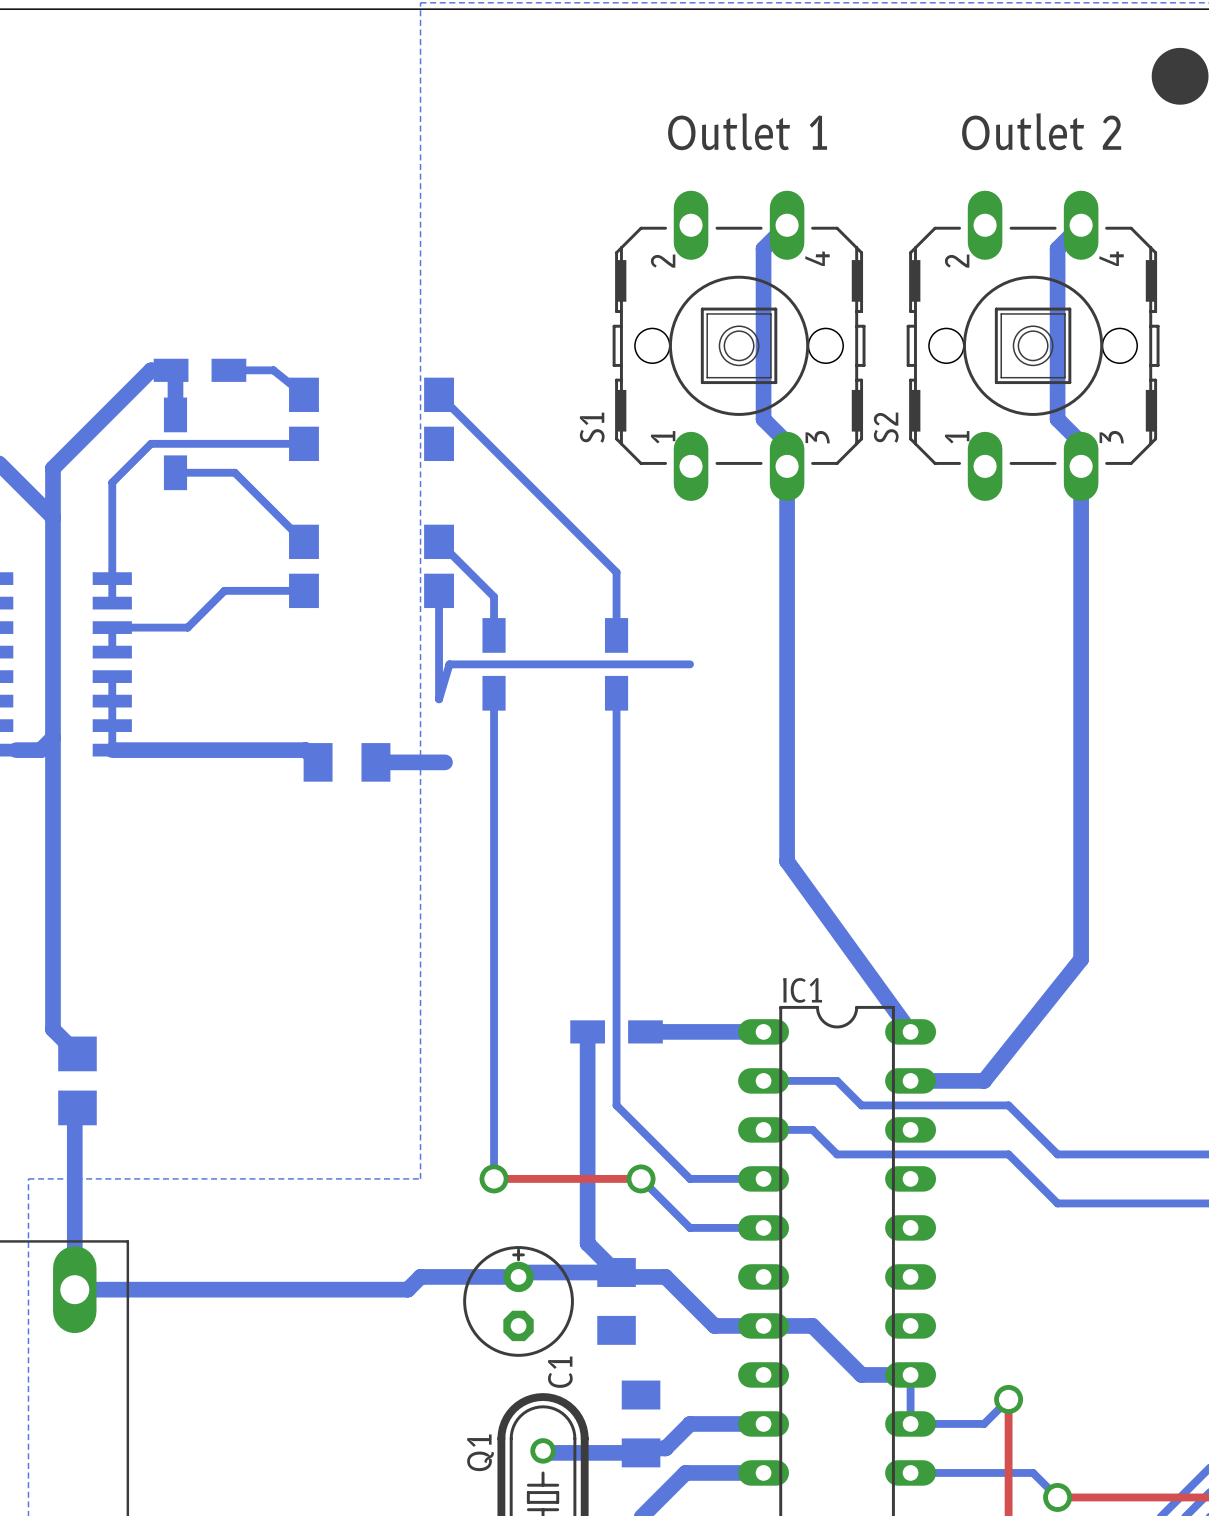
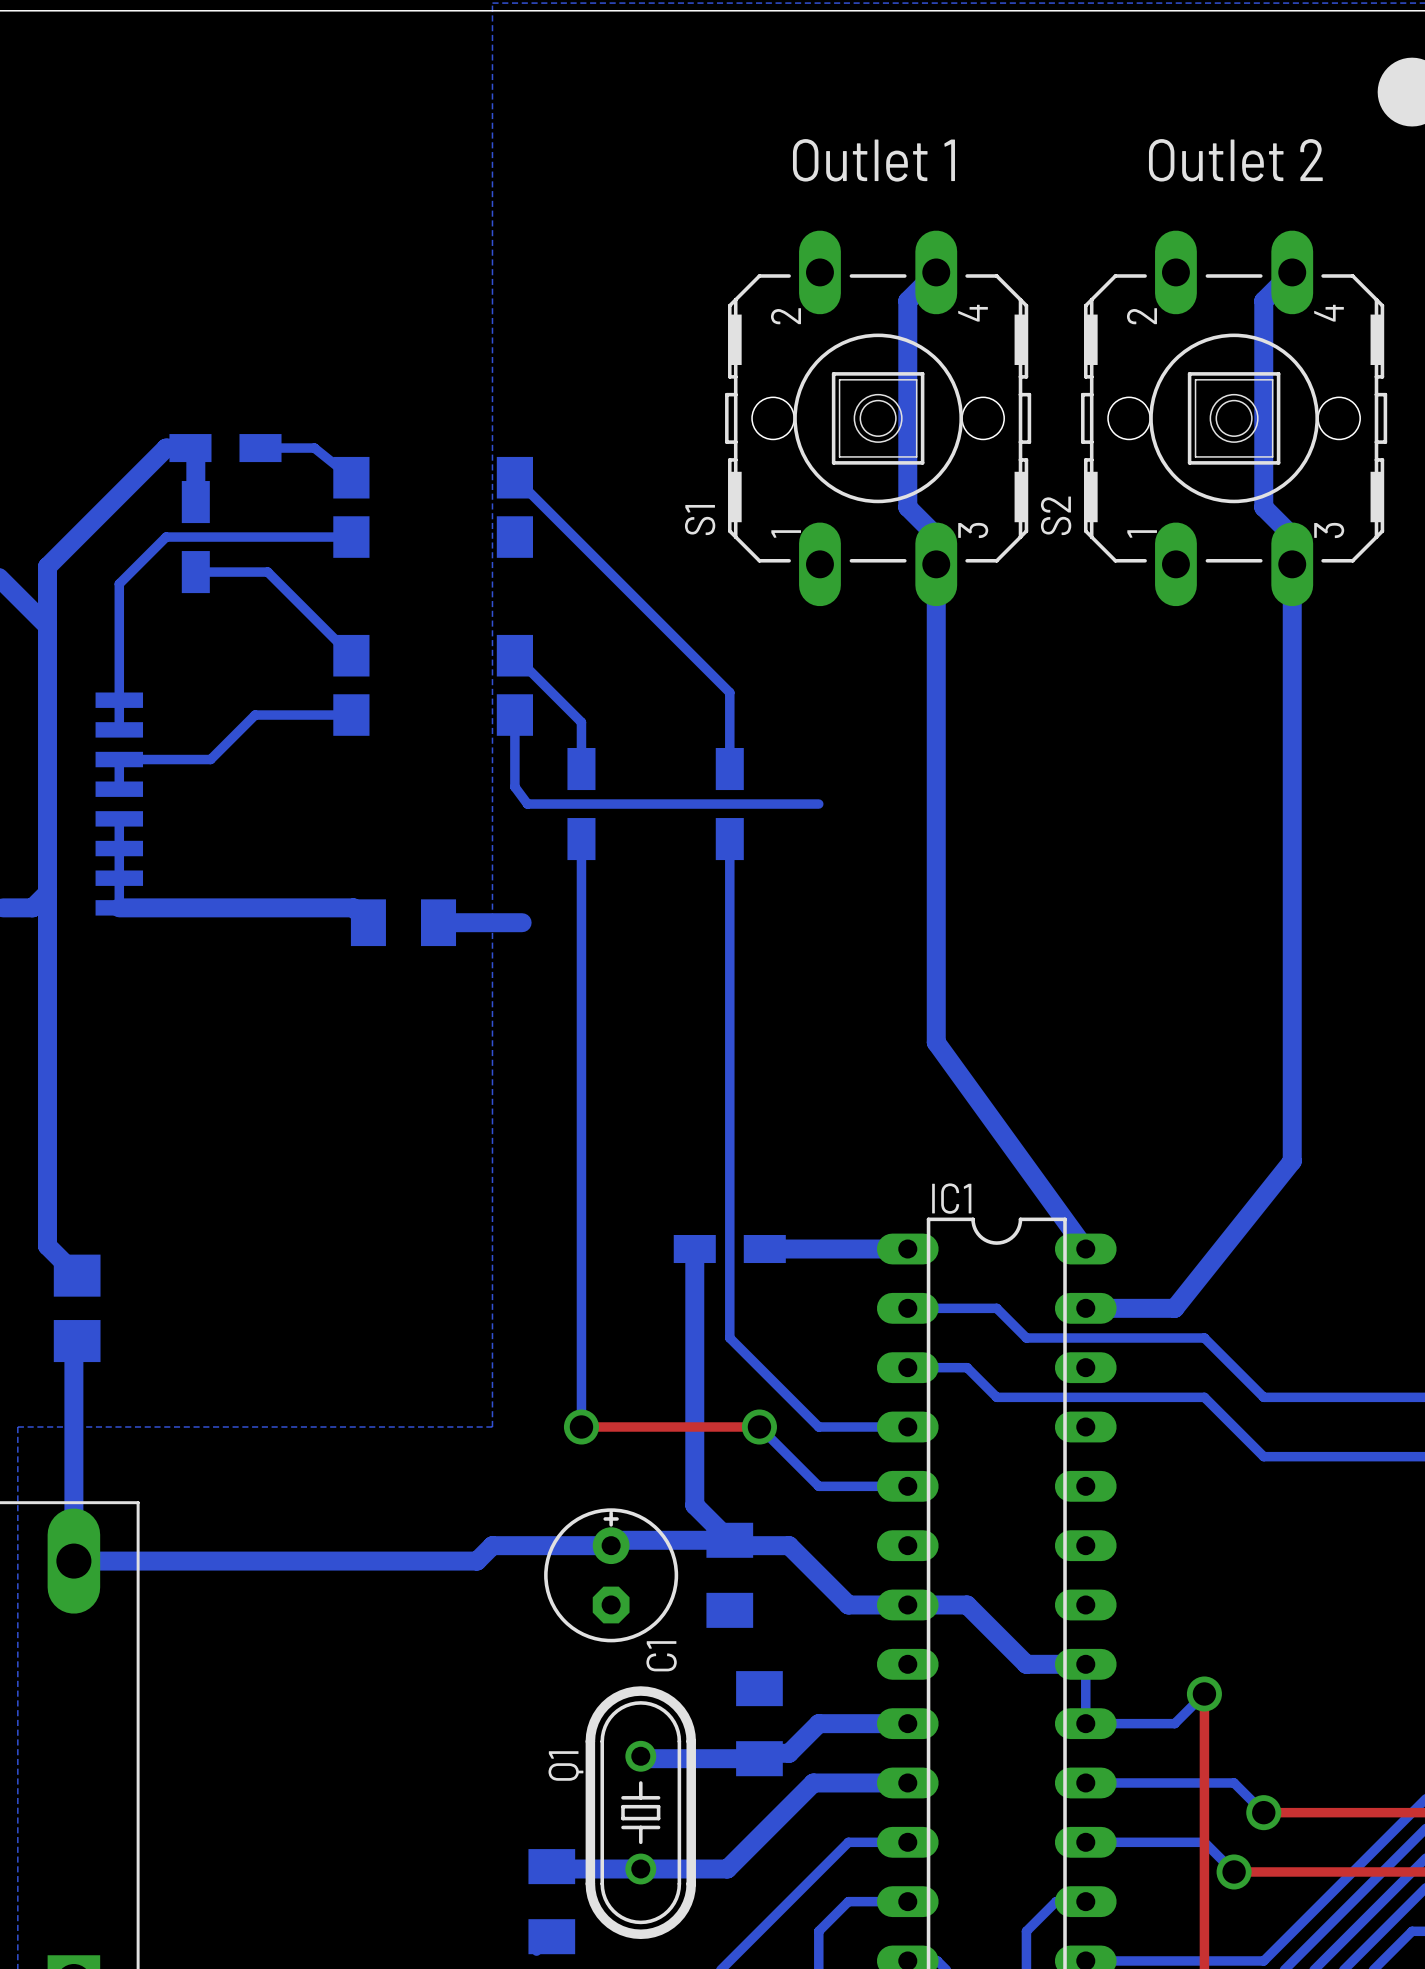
bottom track: (439, 650) (439, 699) (449, 664) -> (514, 786) (527, 804)

